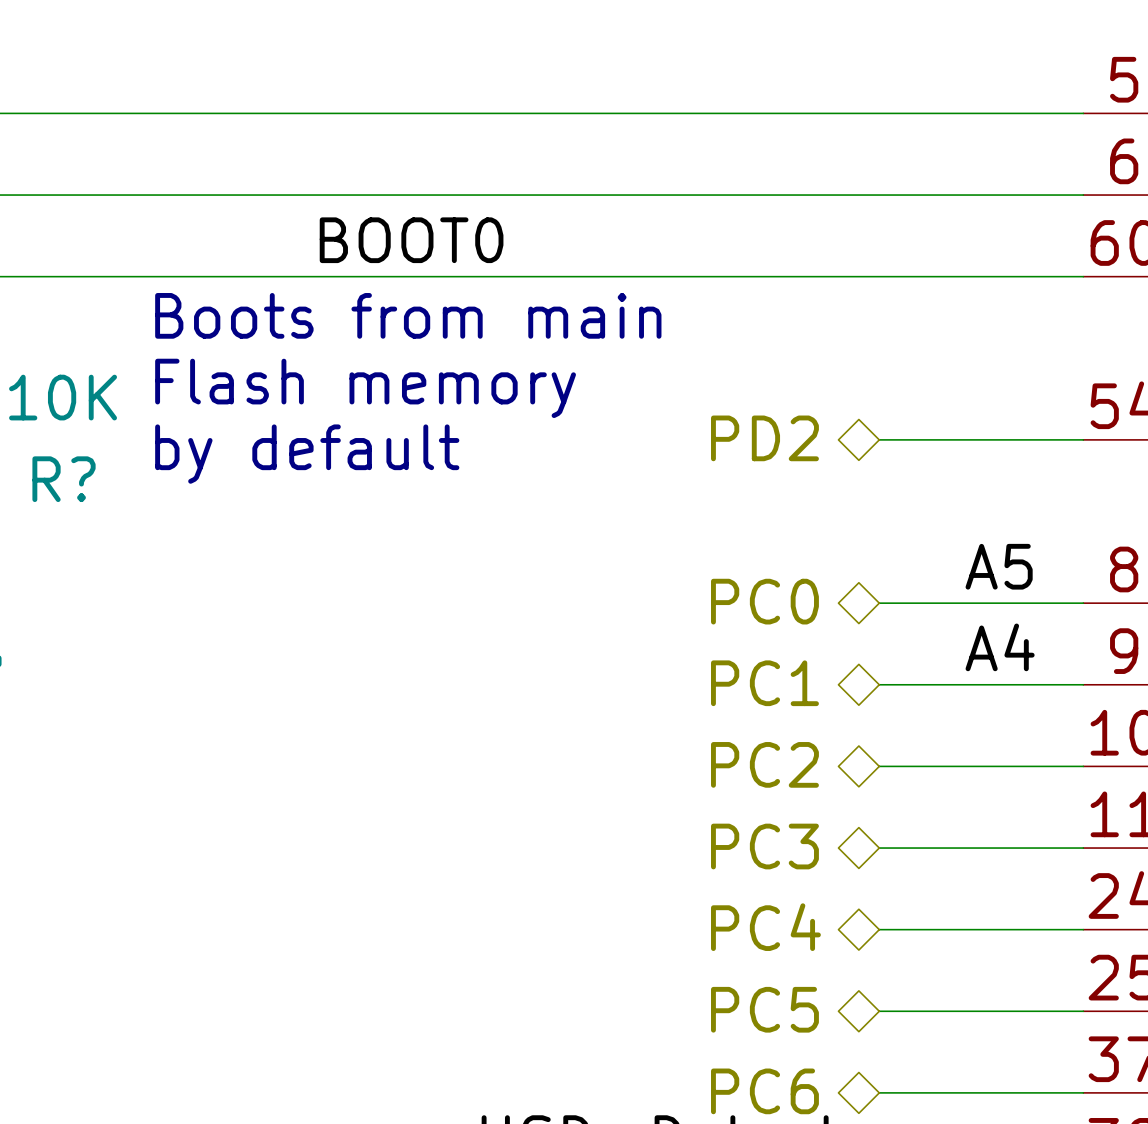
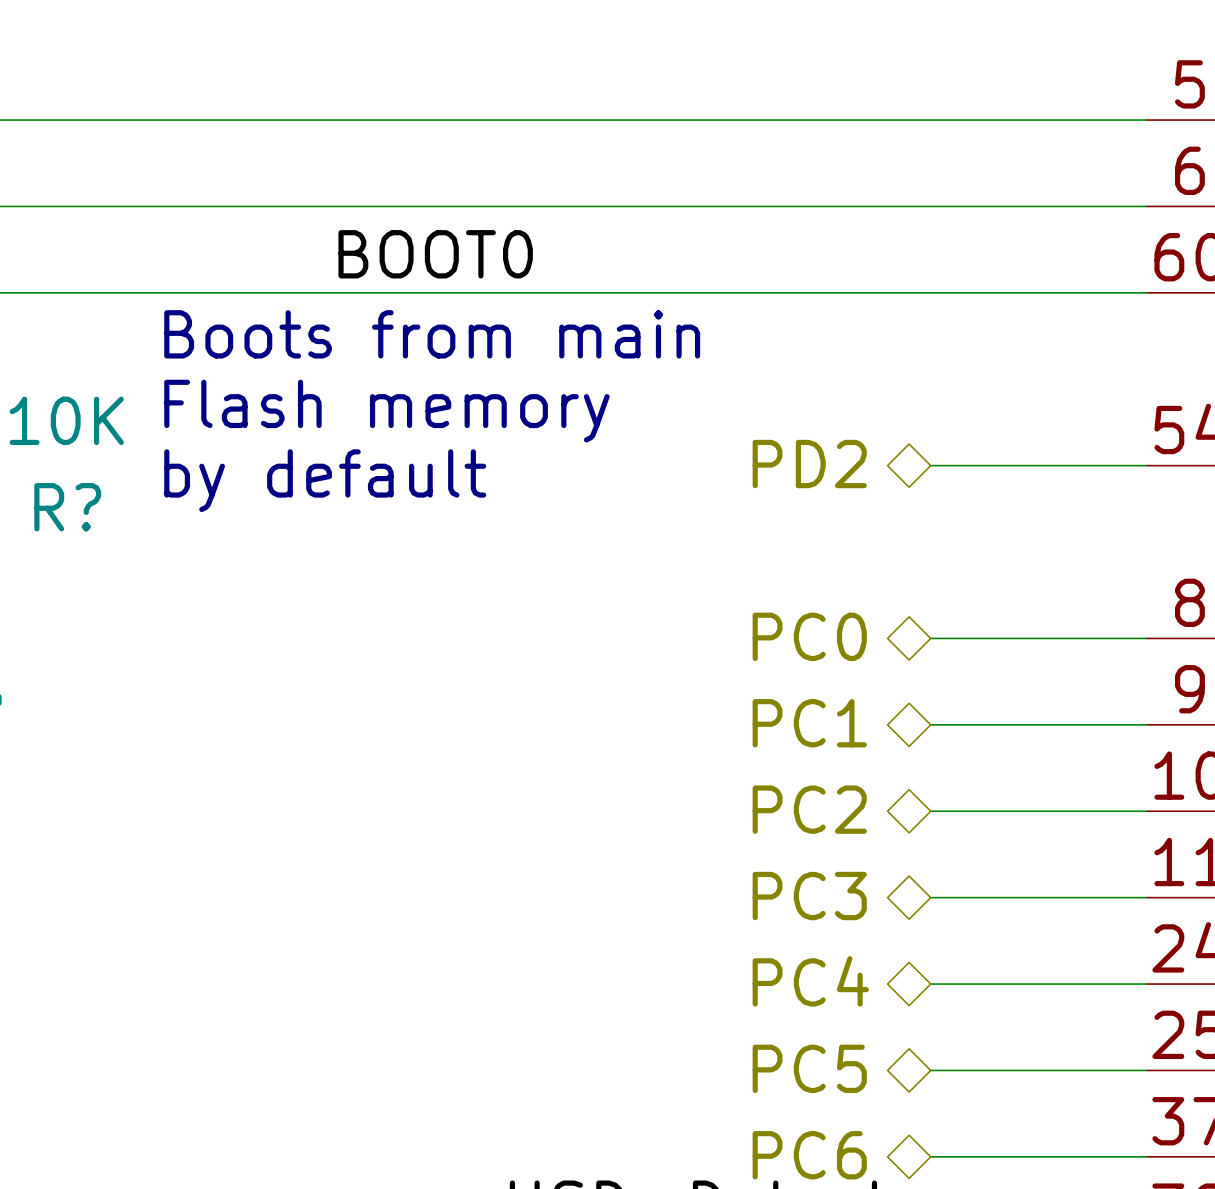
label: A5 (999, 566) -> none
label: A4 (1000, 647) -> none

